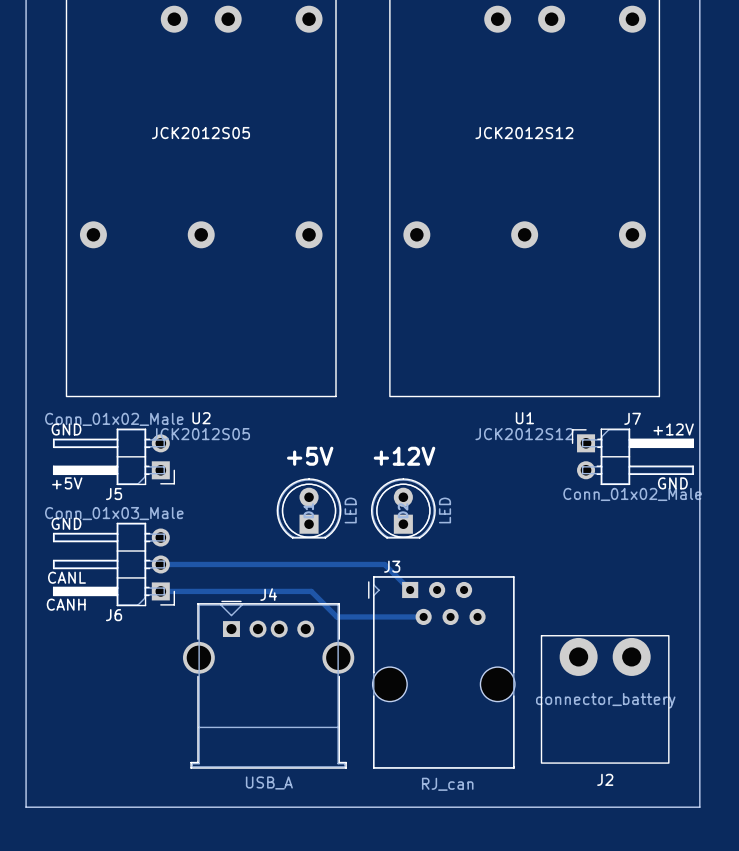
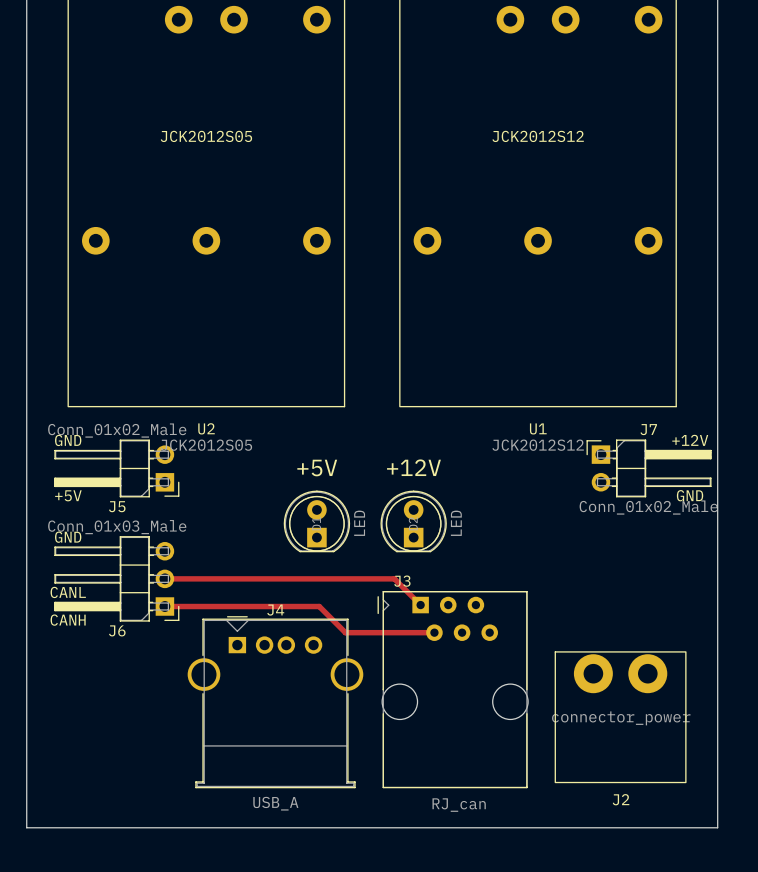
J2 value: connector_battery (605, 700) -> connector_power (621, 718)

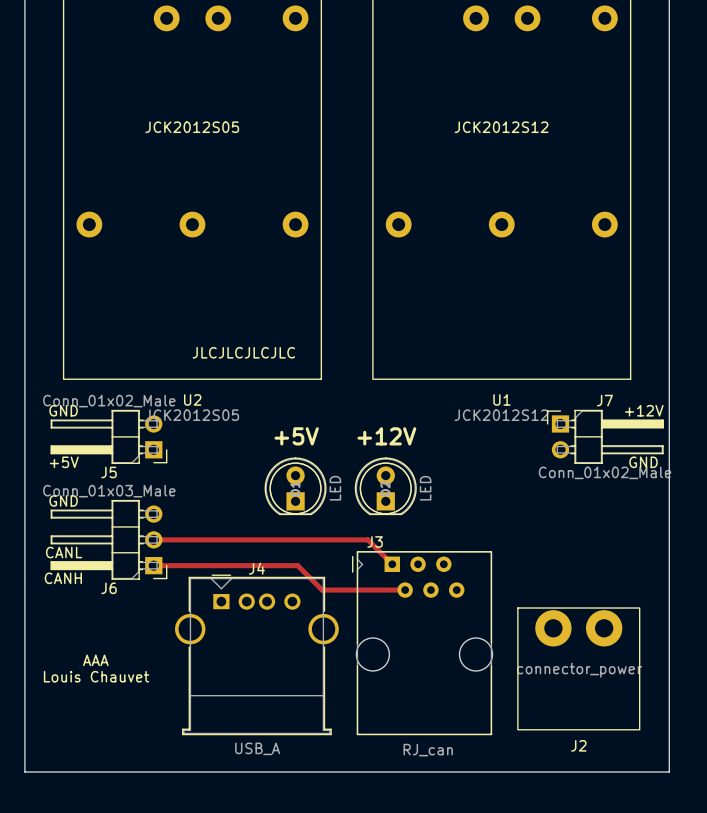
text: none -> JLCJLCJLCJLC (243, 352)
text: none -> AAA (95, 660)
text: none -> Louis Chauvet (96, 676)

